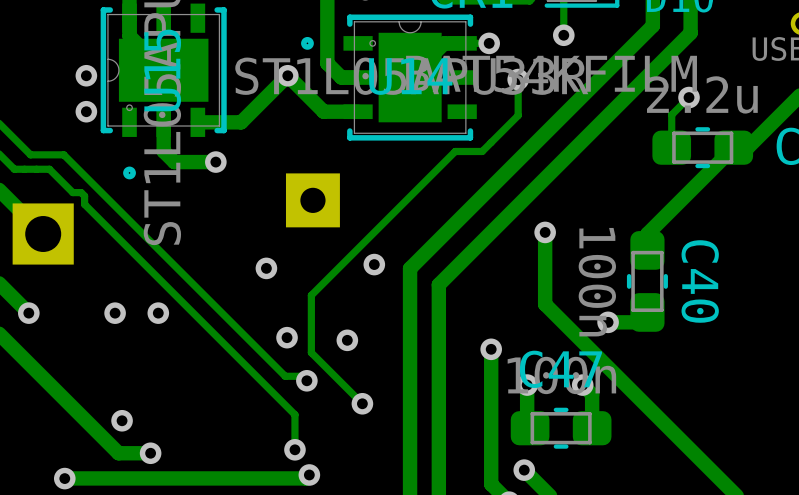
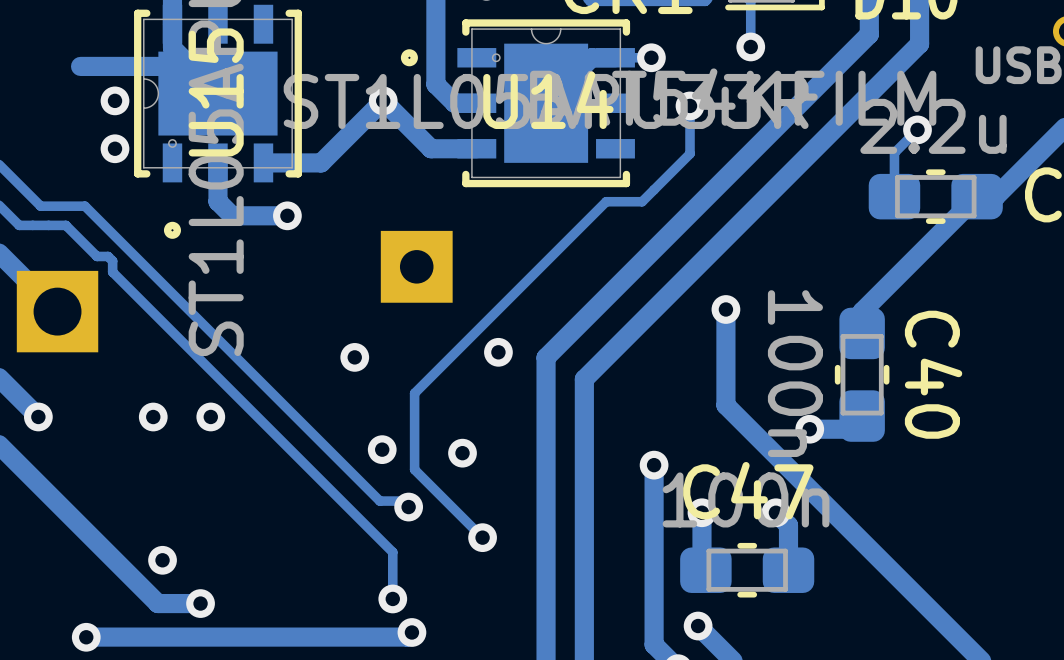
track: none -> (190, 66) (80, 66)

